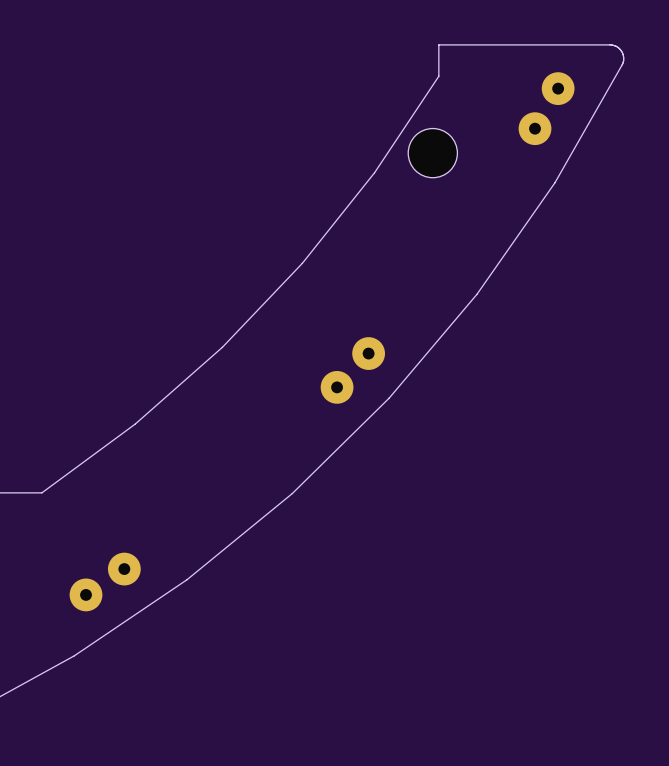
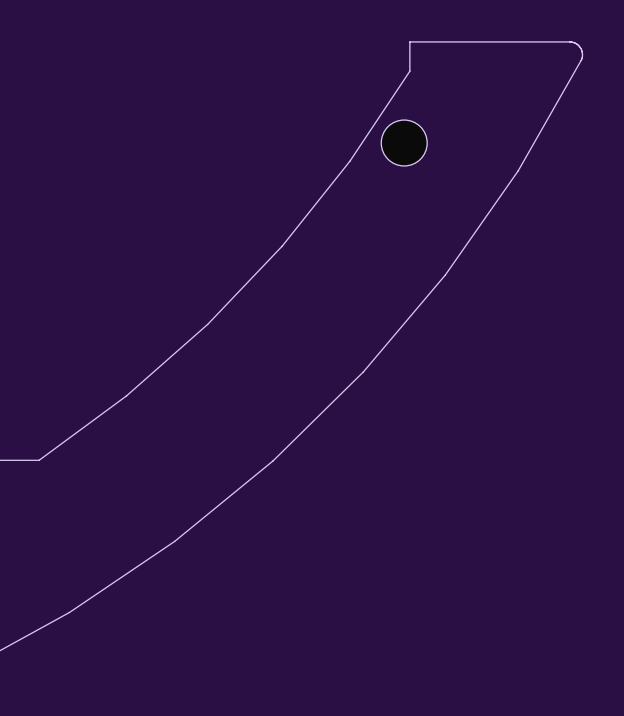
part: (546, 108) -> none
part: (352, 370) -> none
part: (105, 581) -> none

